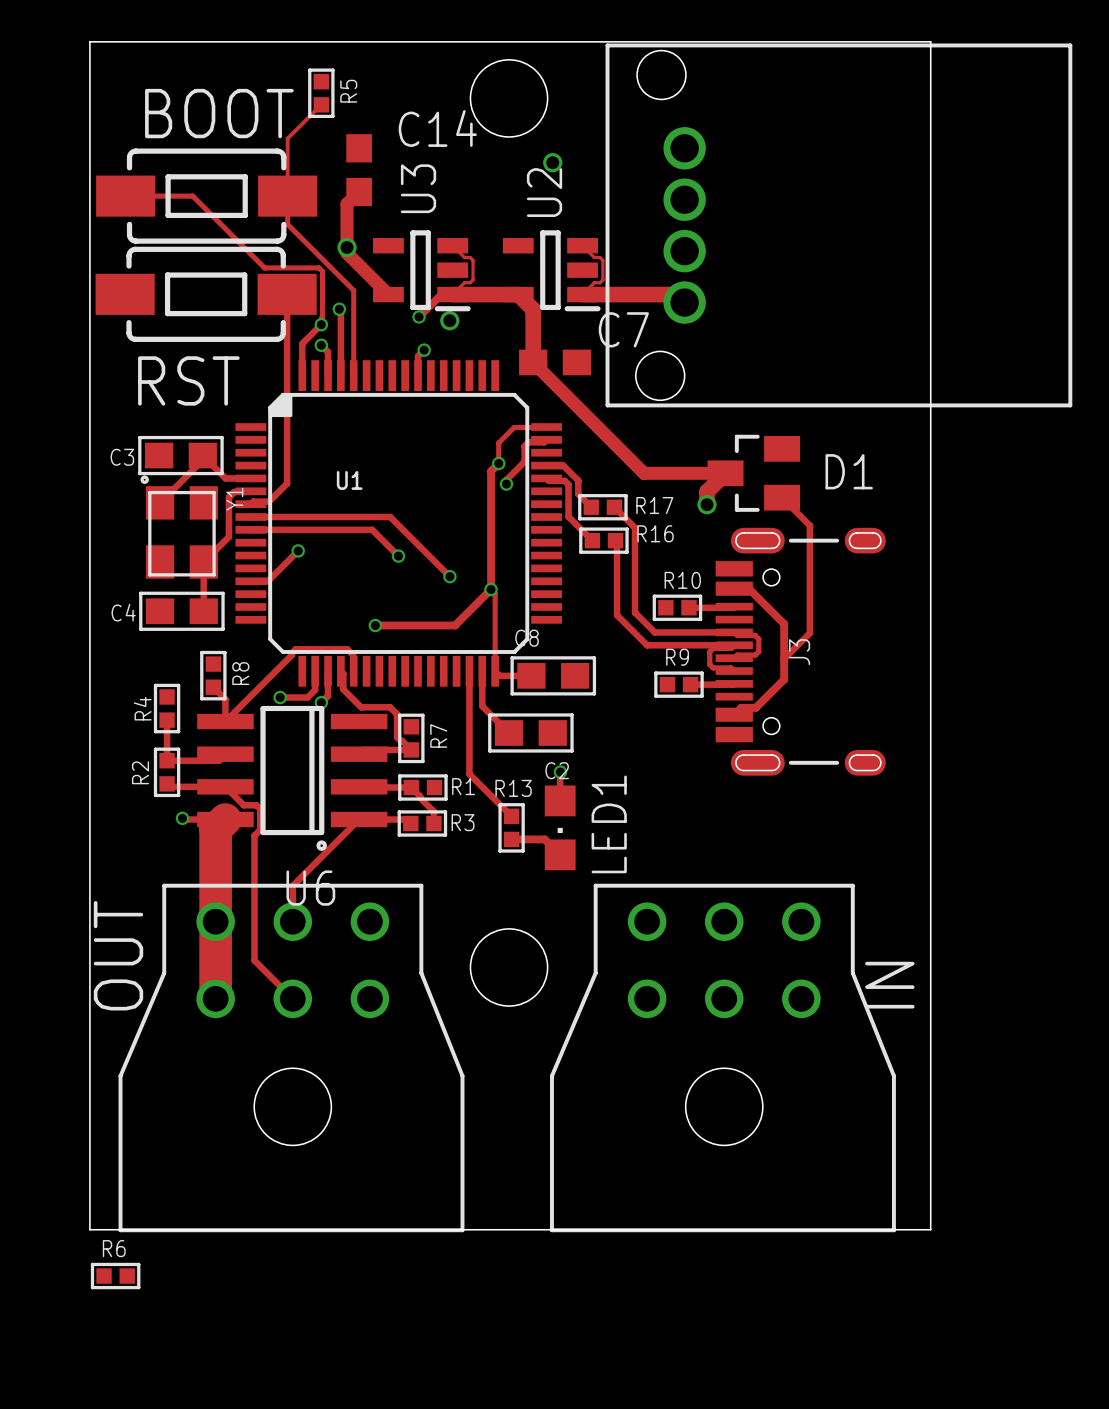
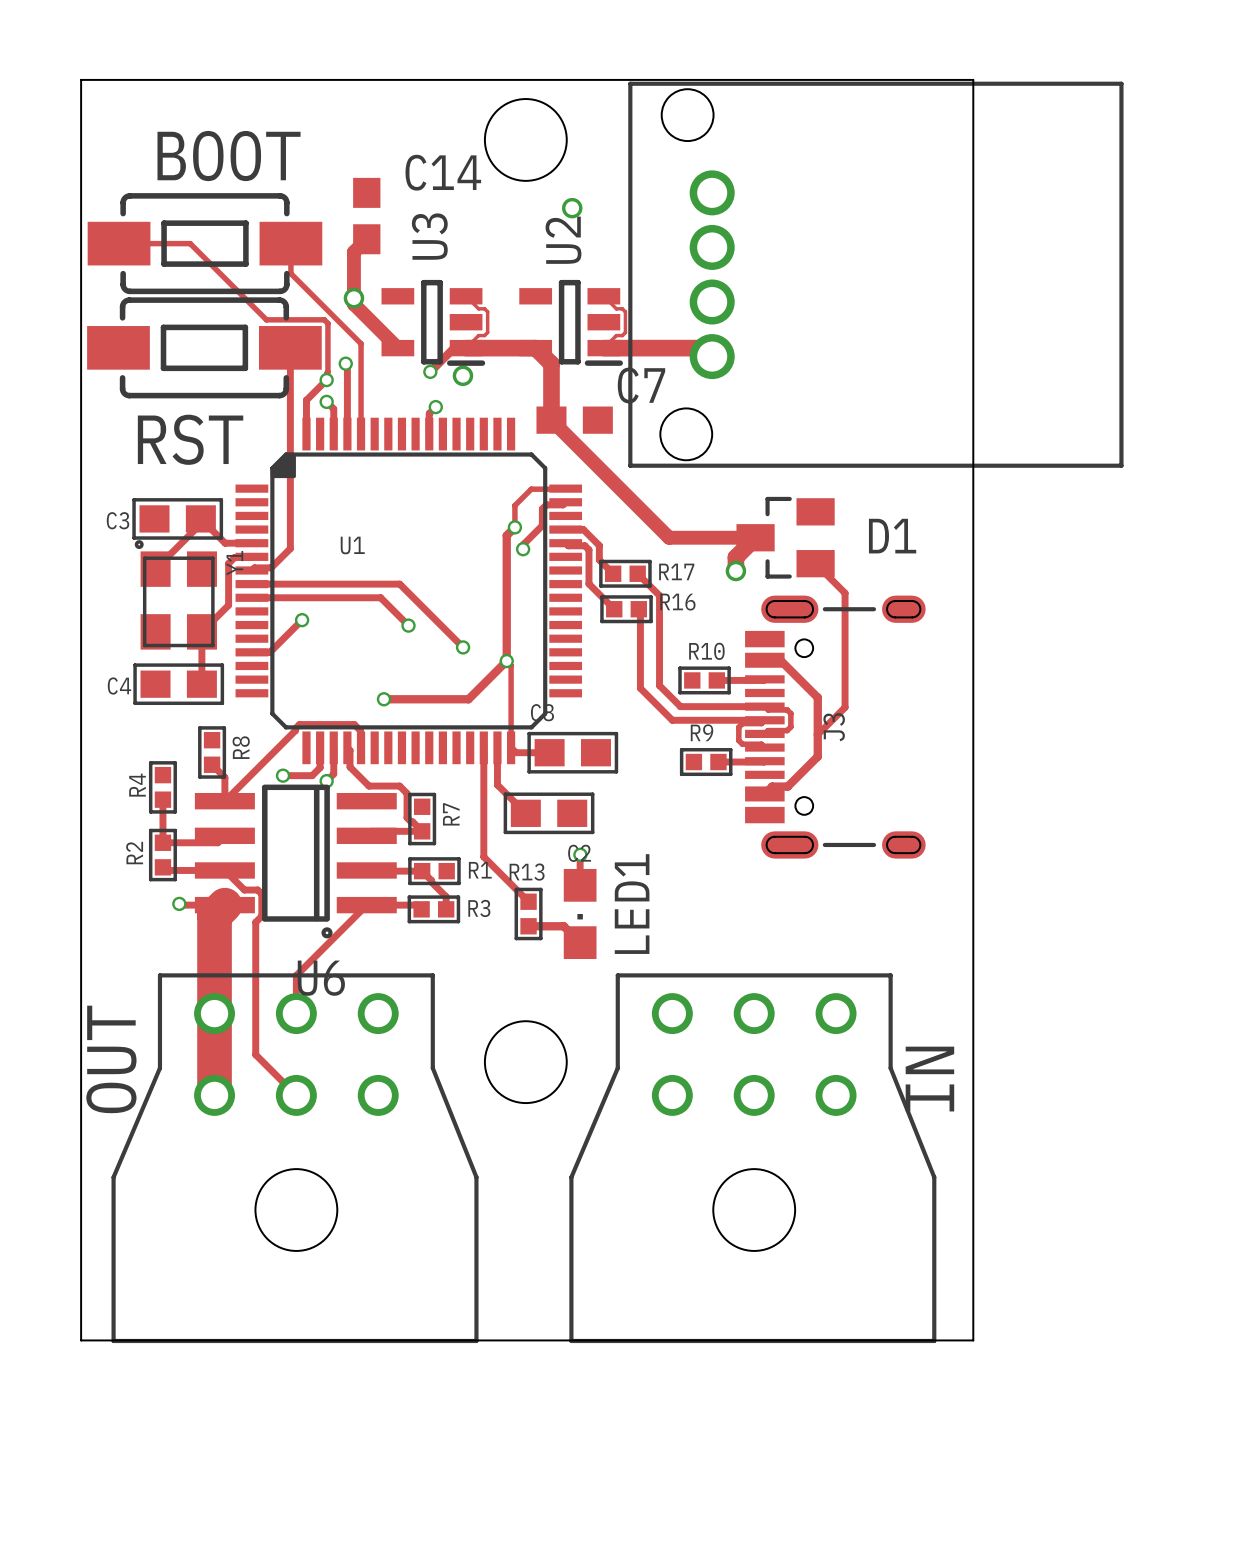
R5: (321, 93) -> none
track: (321, 104) (287, 138) (287, 196) -> none
R6: (115, 1276) -> none

